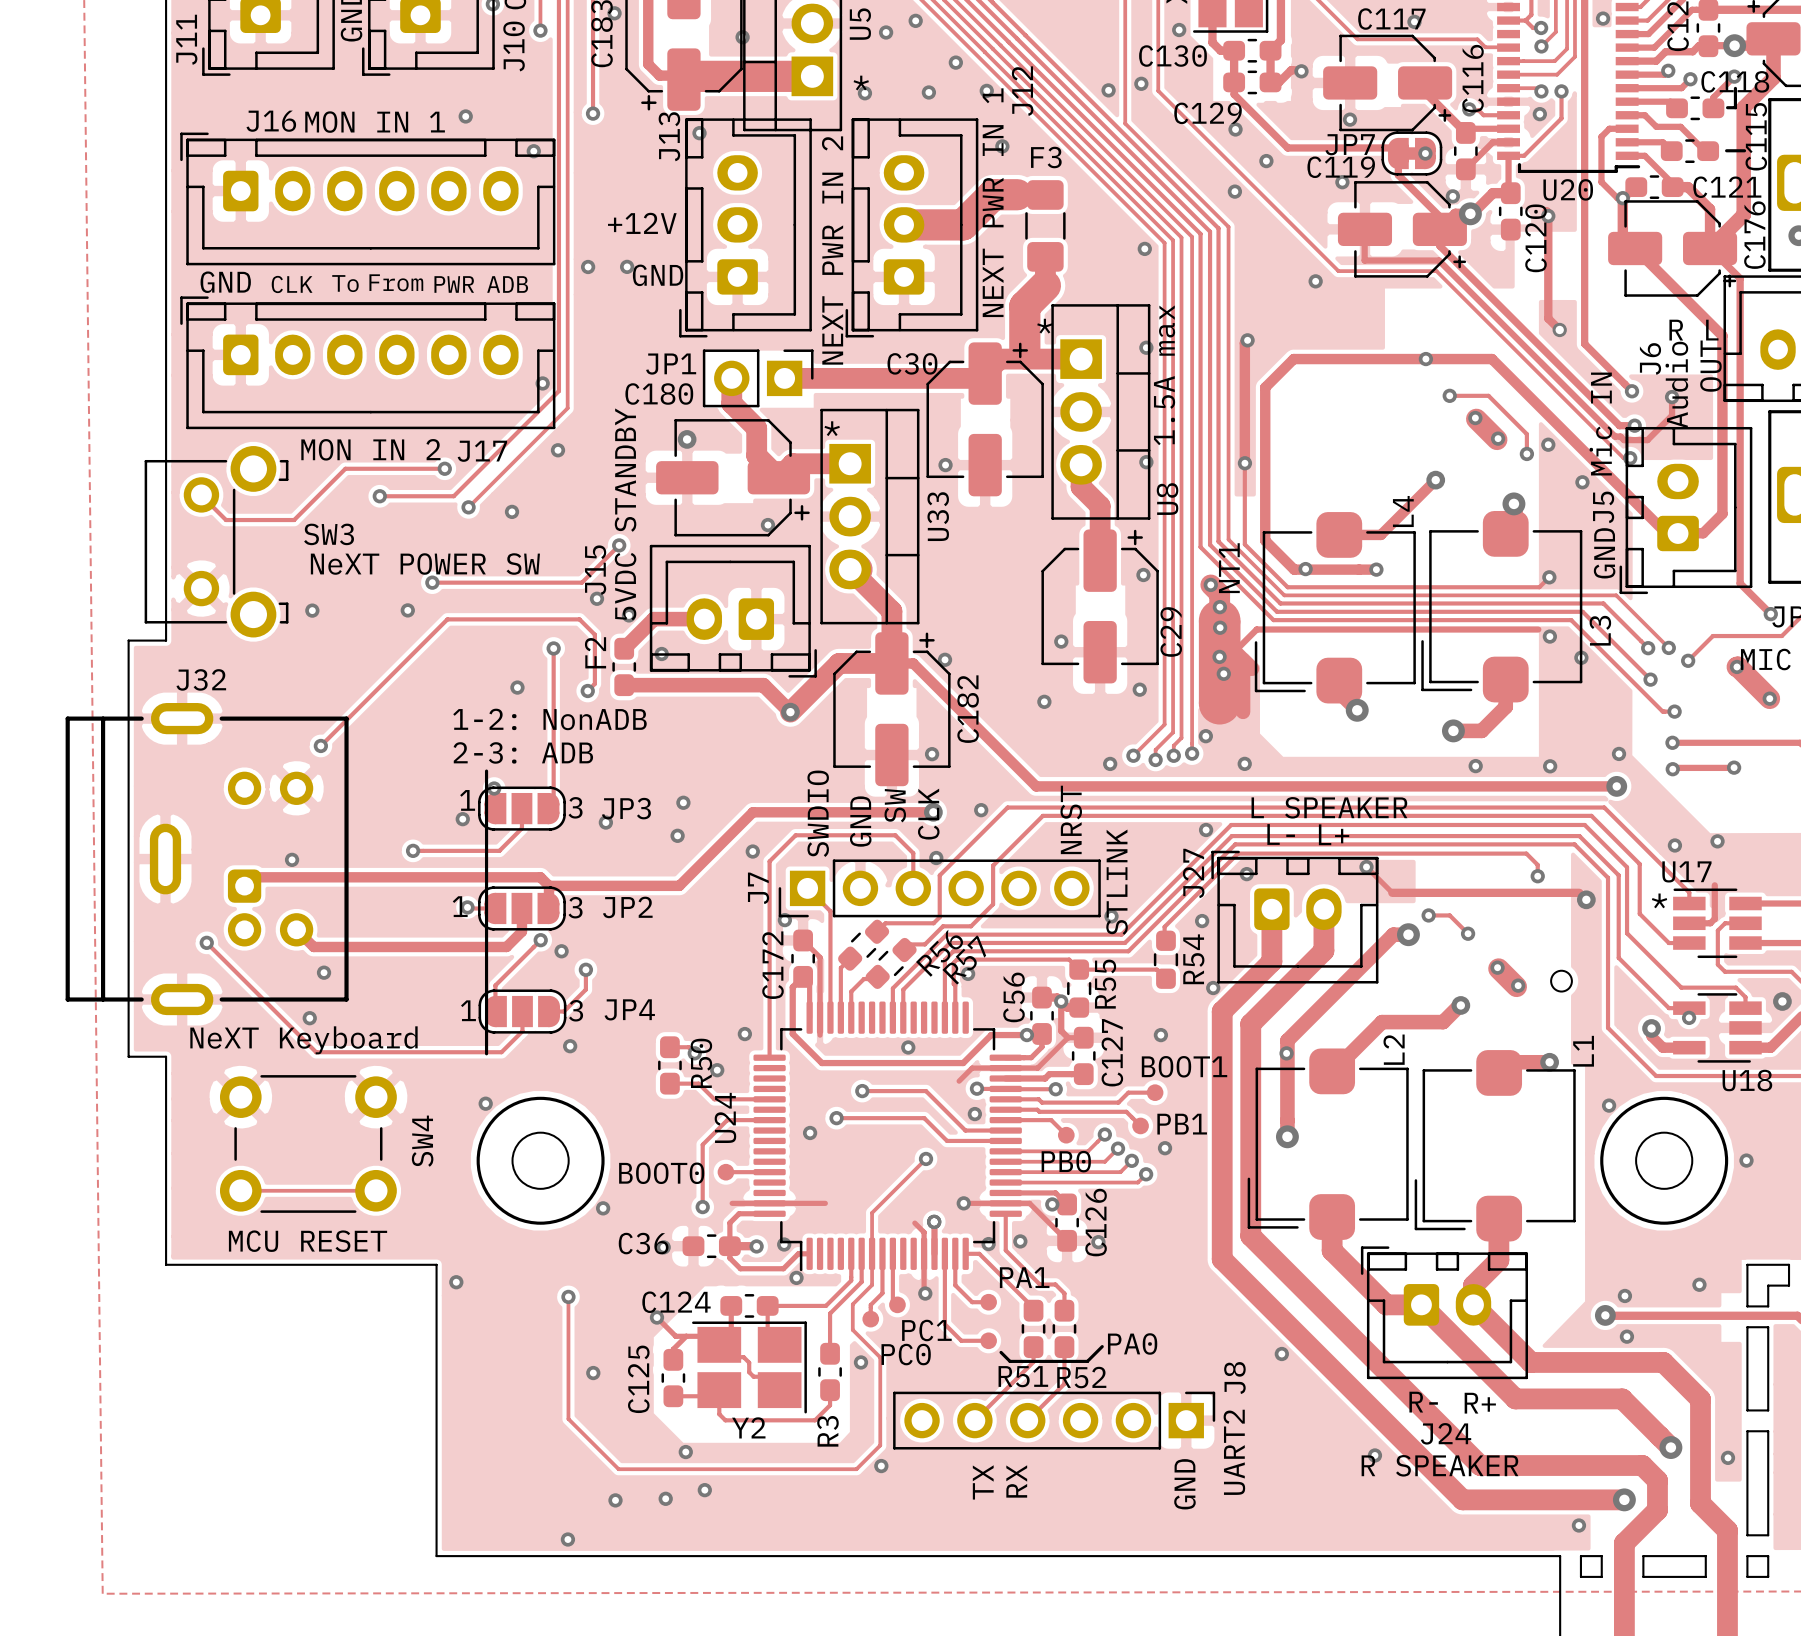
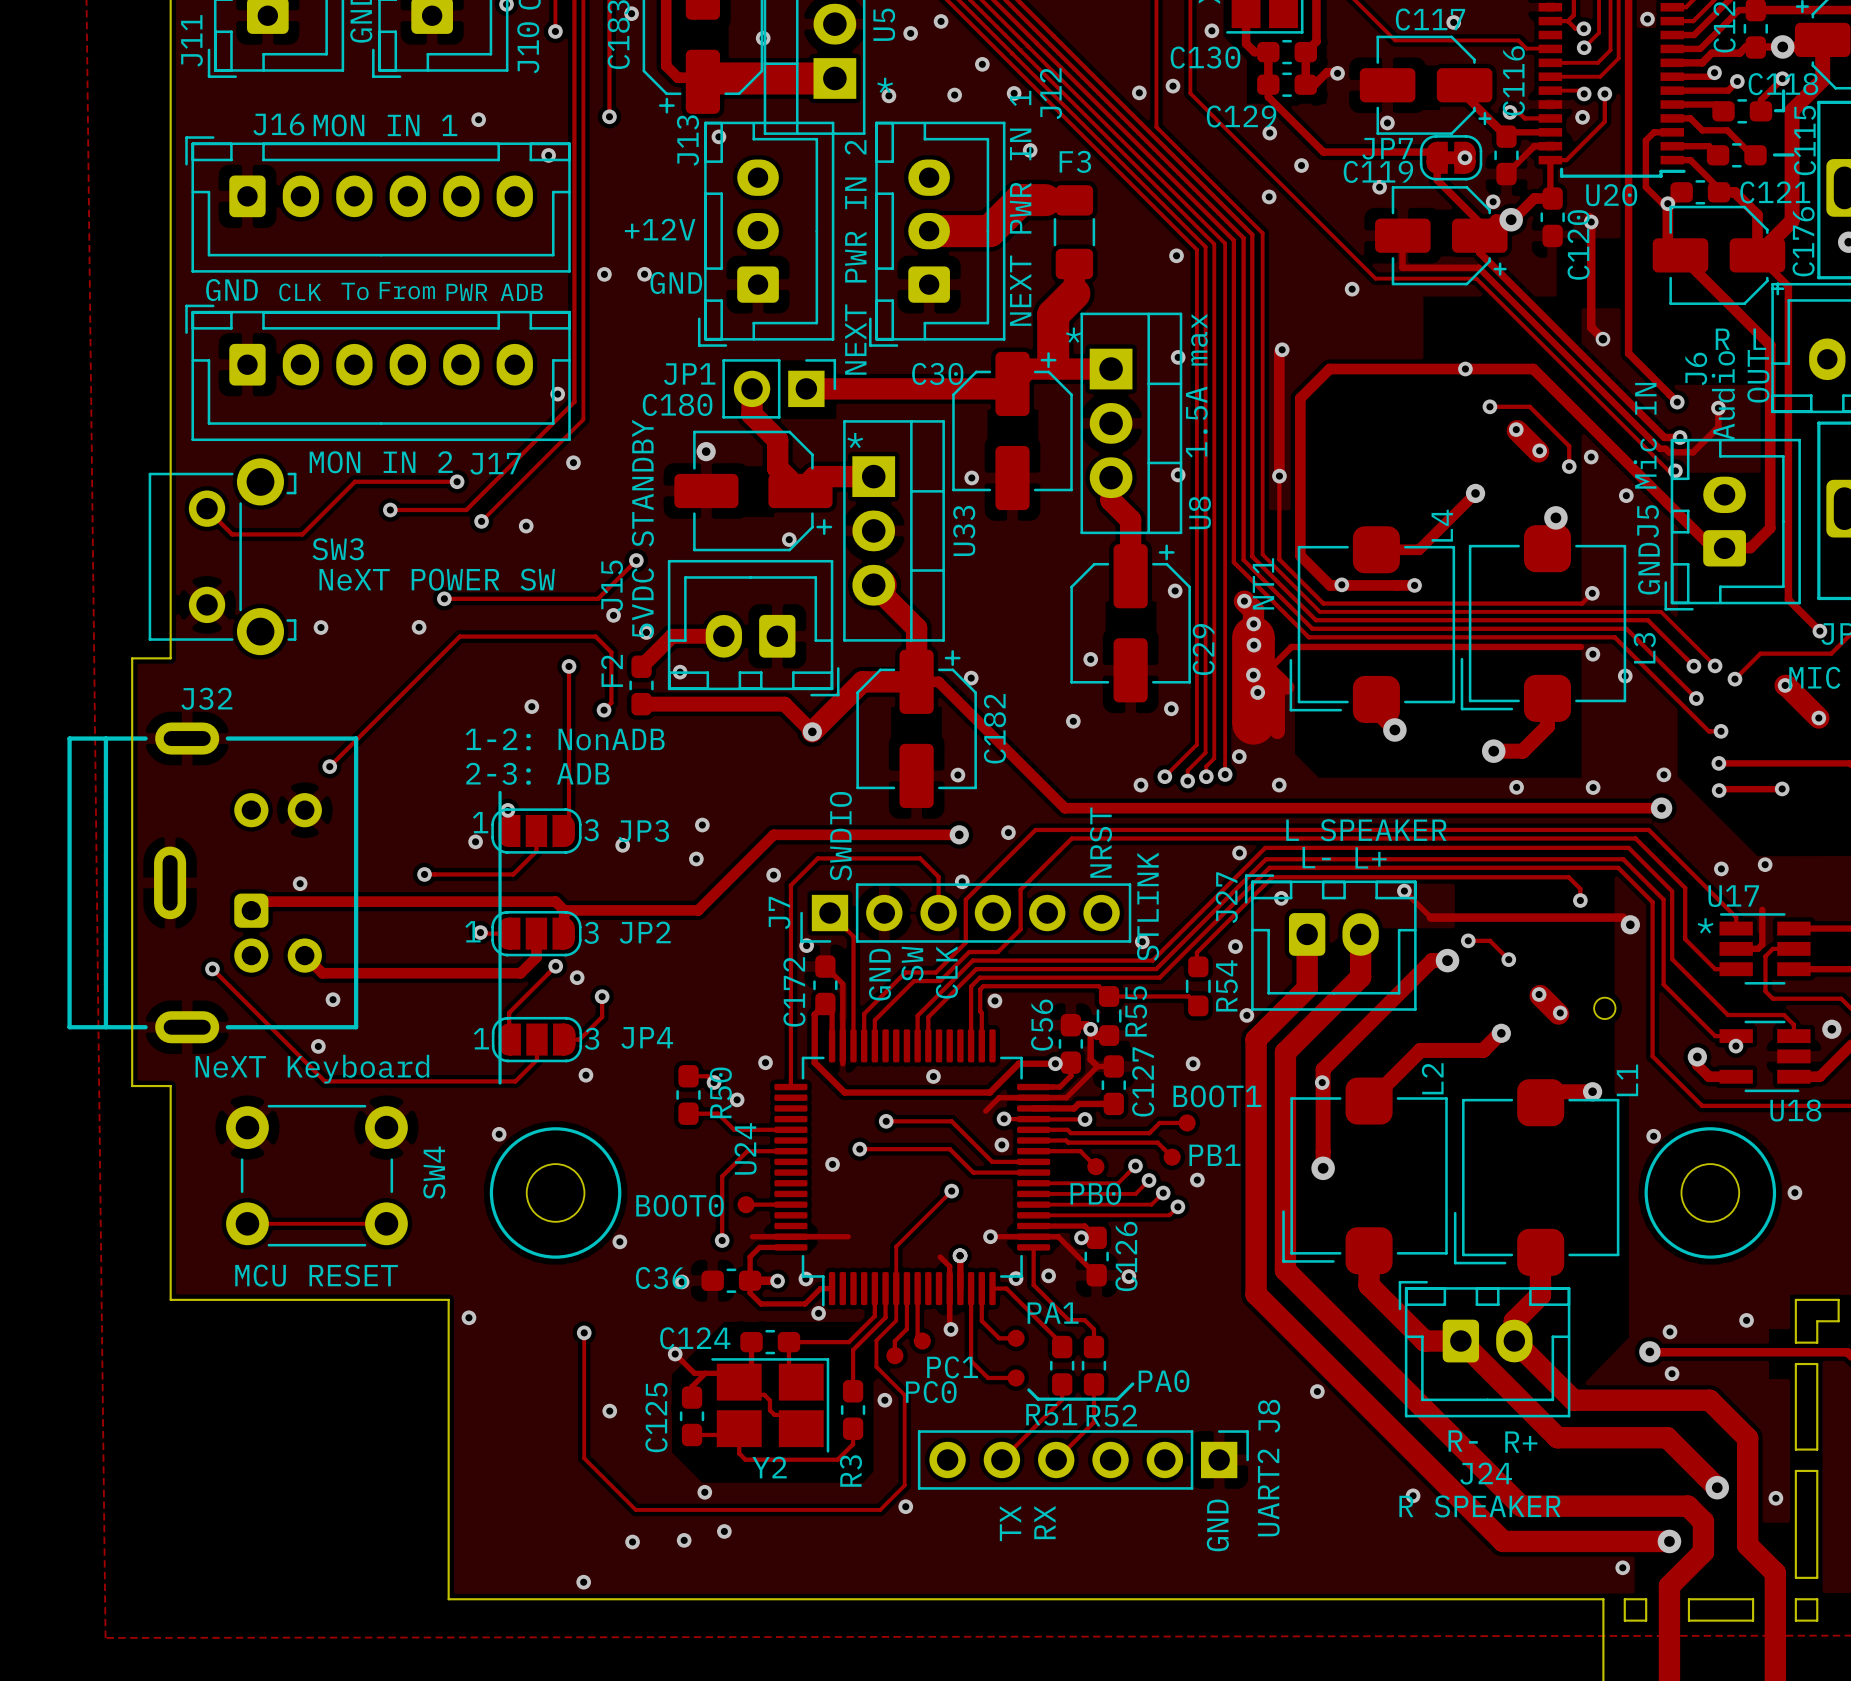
text position: SW (895, 805) -> SW (912, 963)
text position: CLK (928, 814) -> CLK (946, 972)
text position: GND (860, 821) -> GND (879, 974)
track: (933, 923) (885, 923) (877, 931) -> (959, 948) (935, 972) (905, 972) (864, 1013)
track: (943, 926) (924, 944) (910, 944) (904, 950) -> (969, 952) (940, 981) (914, 981) (874, 1020)
R56: (863, 945) -> none
track: (850, 958) (840, 967) (840, 986) -> none
R57: (891, 963) -> none
track: (877, 976) (875, 979) (863, 979) (851, 992) -> none

